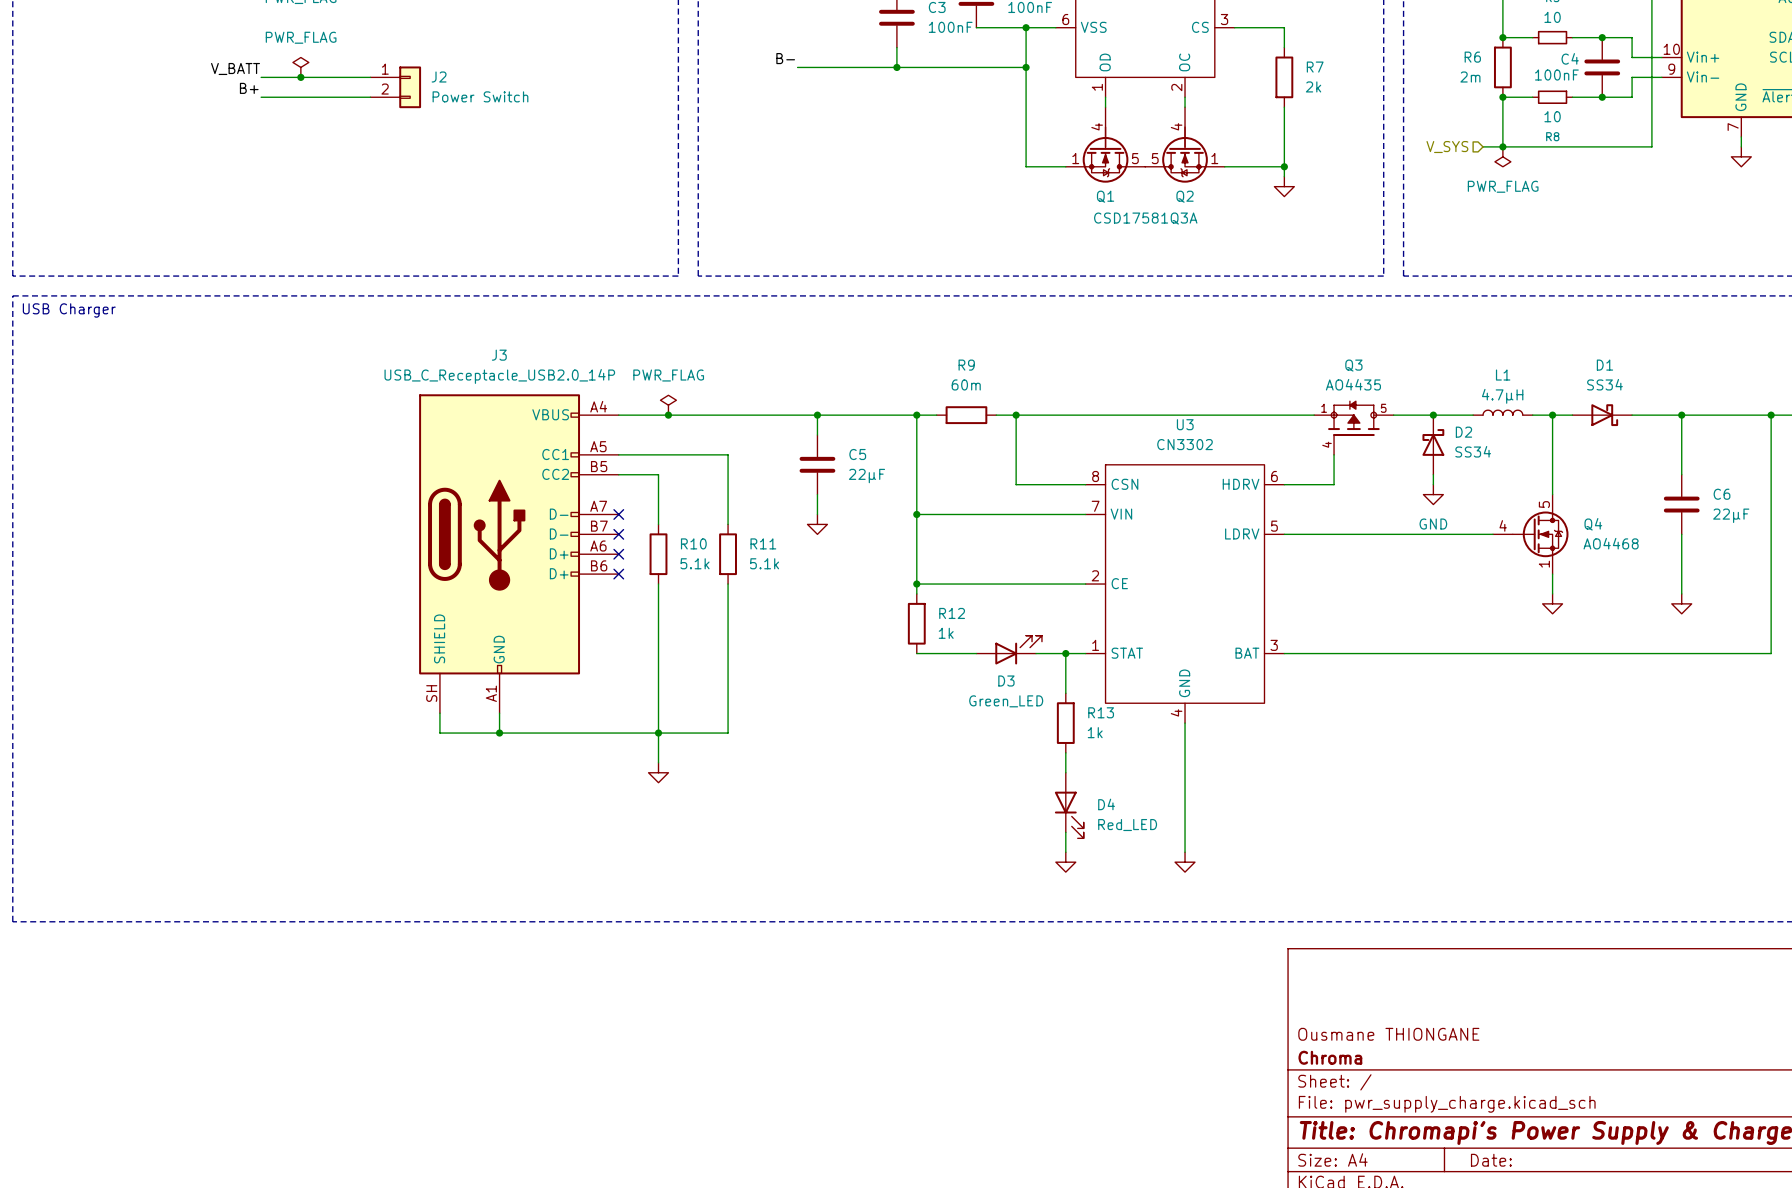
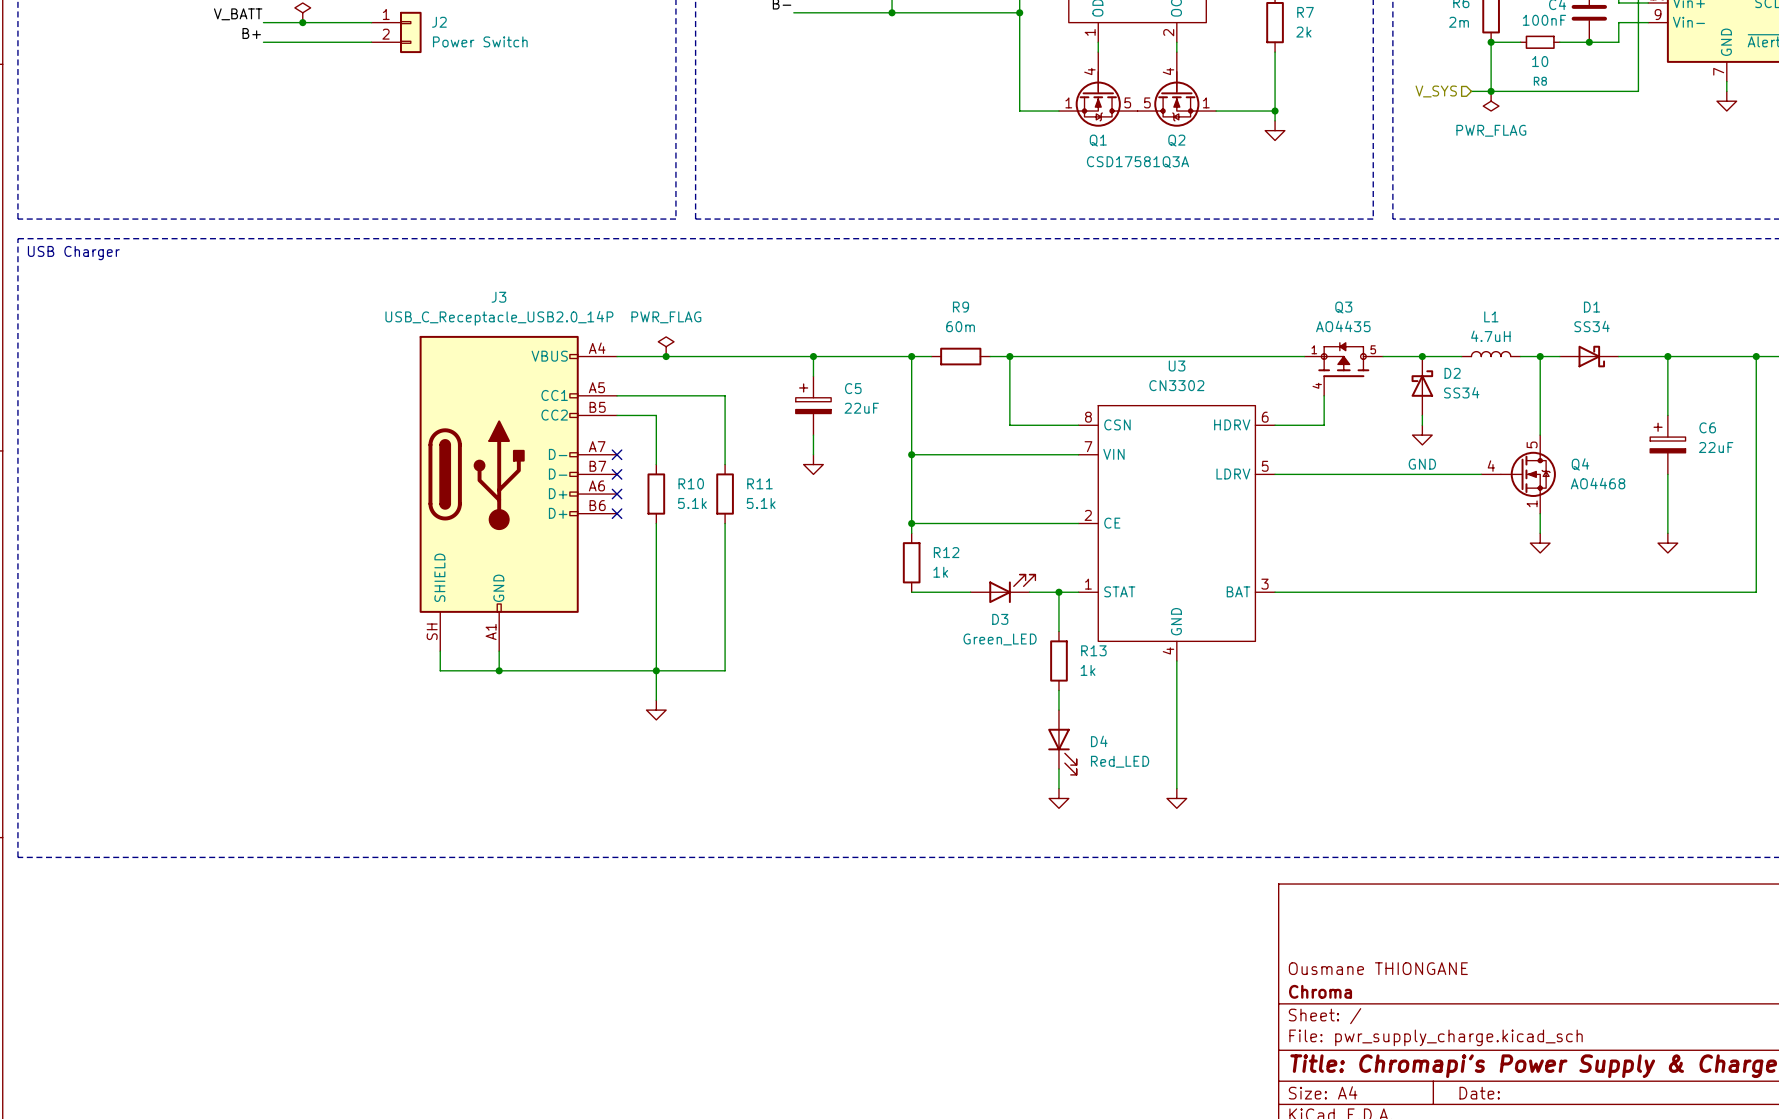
L1 value: 4.7µH (1502, 396) -> 4.7uH (1490, 336)
C5 symbol: [799, 435, 836, 495] -> [795, 376, 832, 436]
C6 symbol: [1663, 474, 1700, 535] -> [1650, 415, 1686, 475]
C5 value: 22µF (866, 476) -> 22uF (861, 408)
C6 value: 22µF (1731, 515) -> 22uF (1716, 447)

